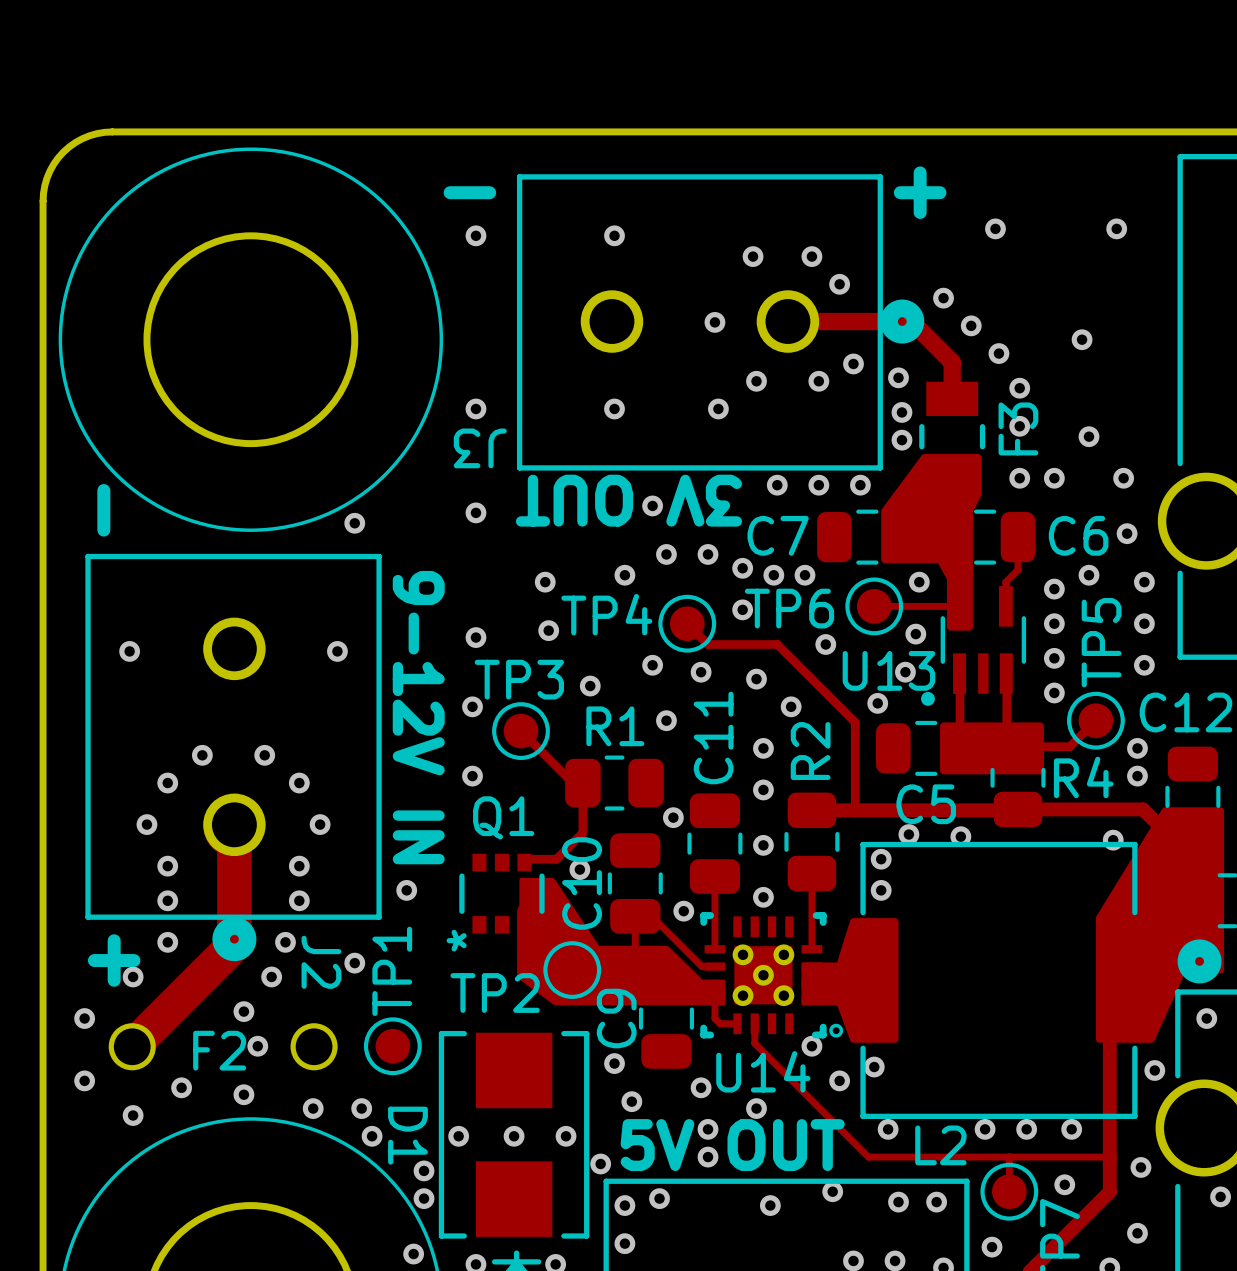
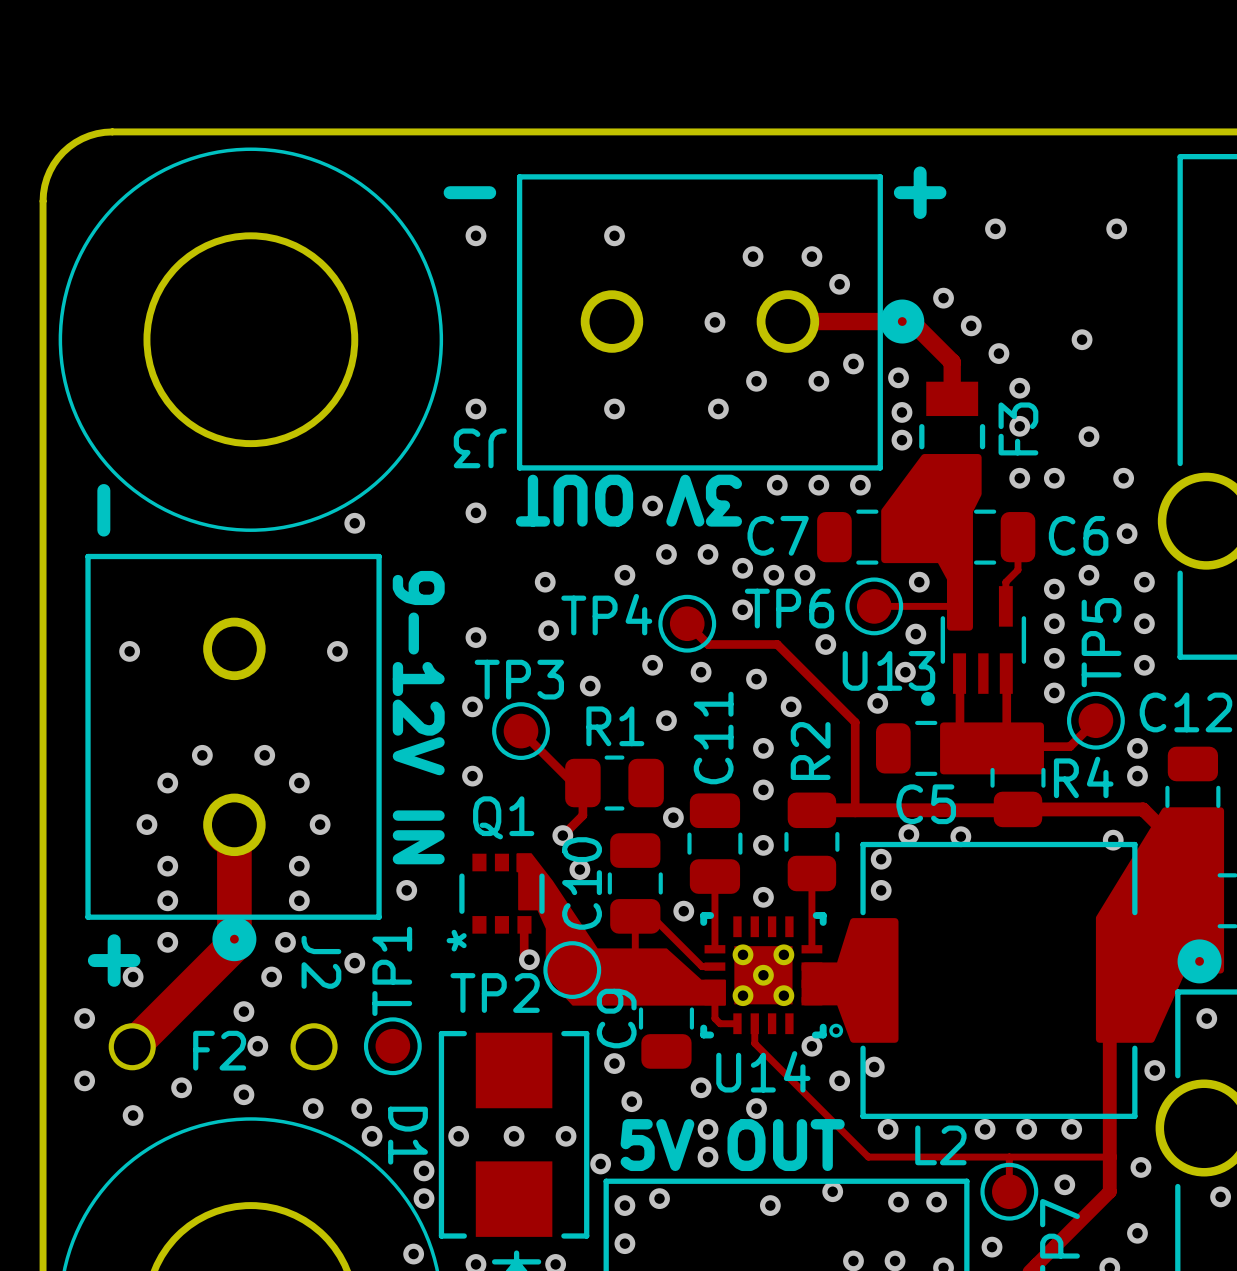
track: (582, 815) (582, 832) (556, 859) (527, 859) -> (582, 815) (562, 835)
via: none -> (562, 835)
drawing shape: [517, 877, 726, 1006] -> [516, 853, 726, 1006]
track: none -> (524, 925) (524, 954) (529, 959)
via: none -> (529, 959)

